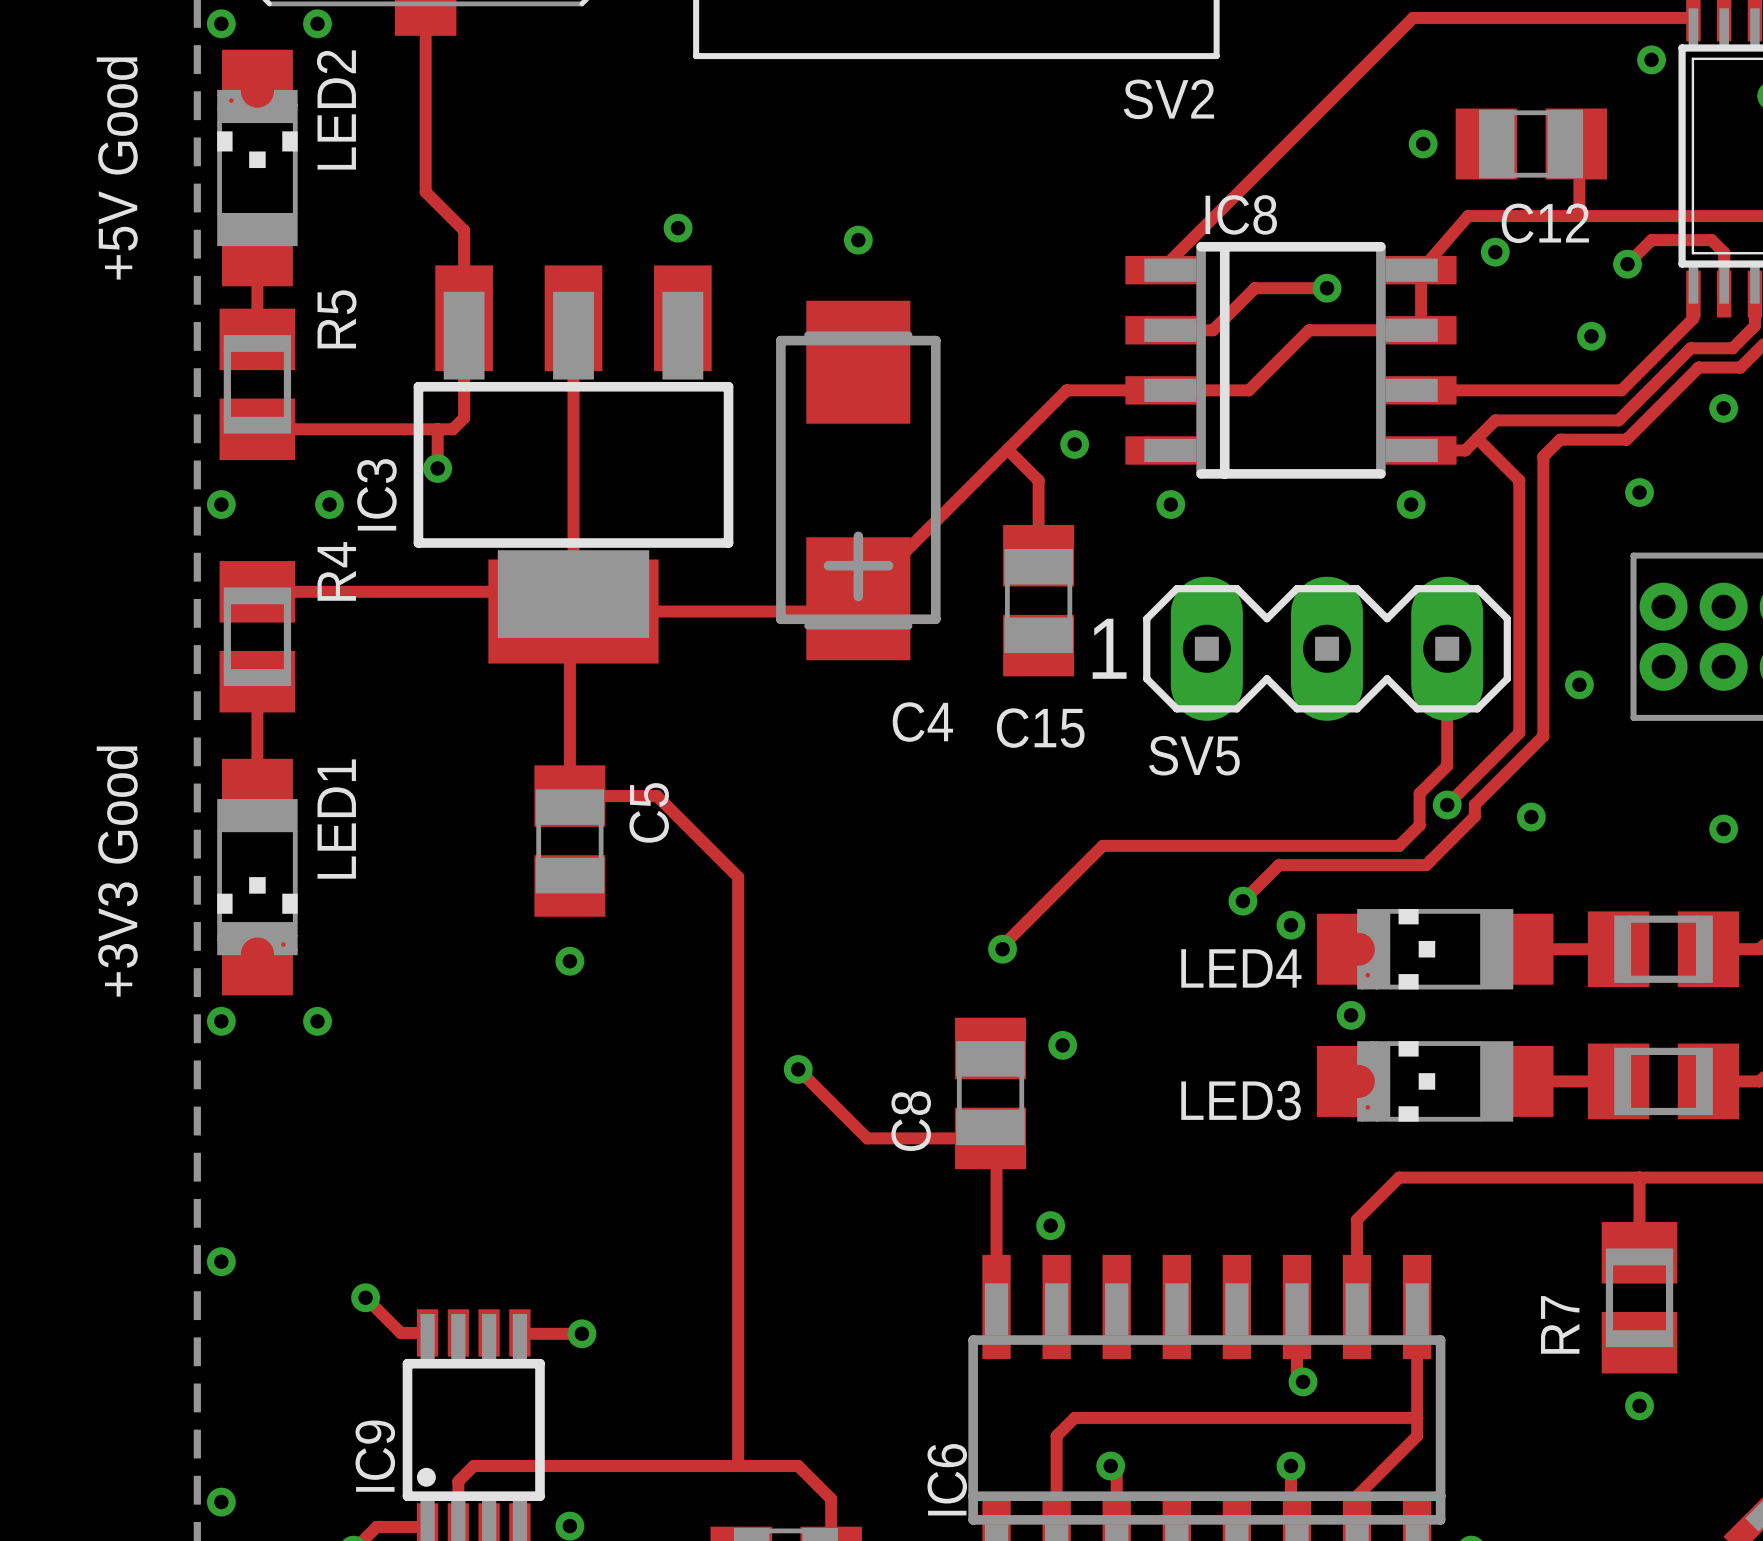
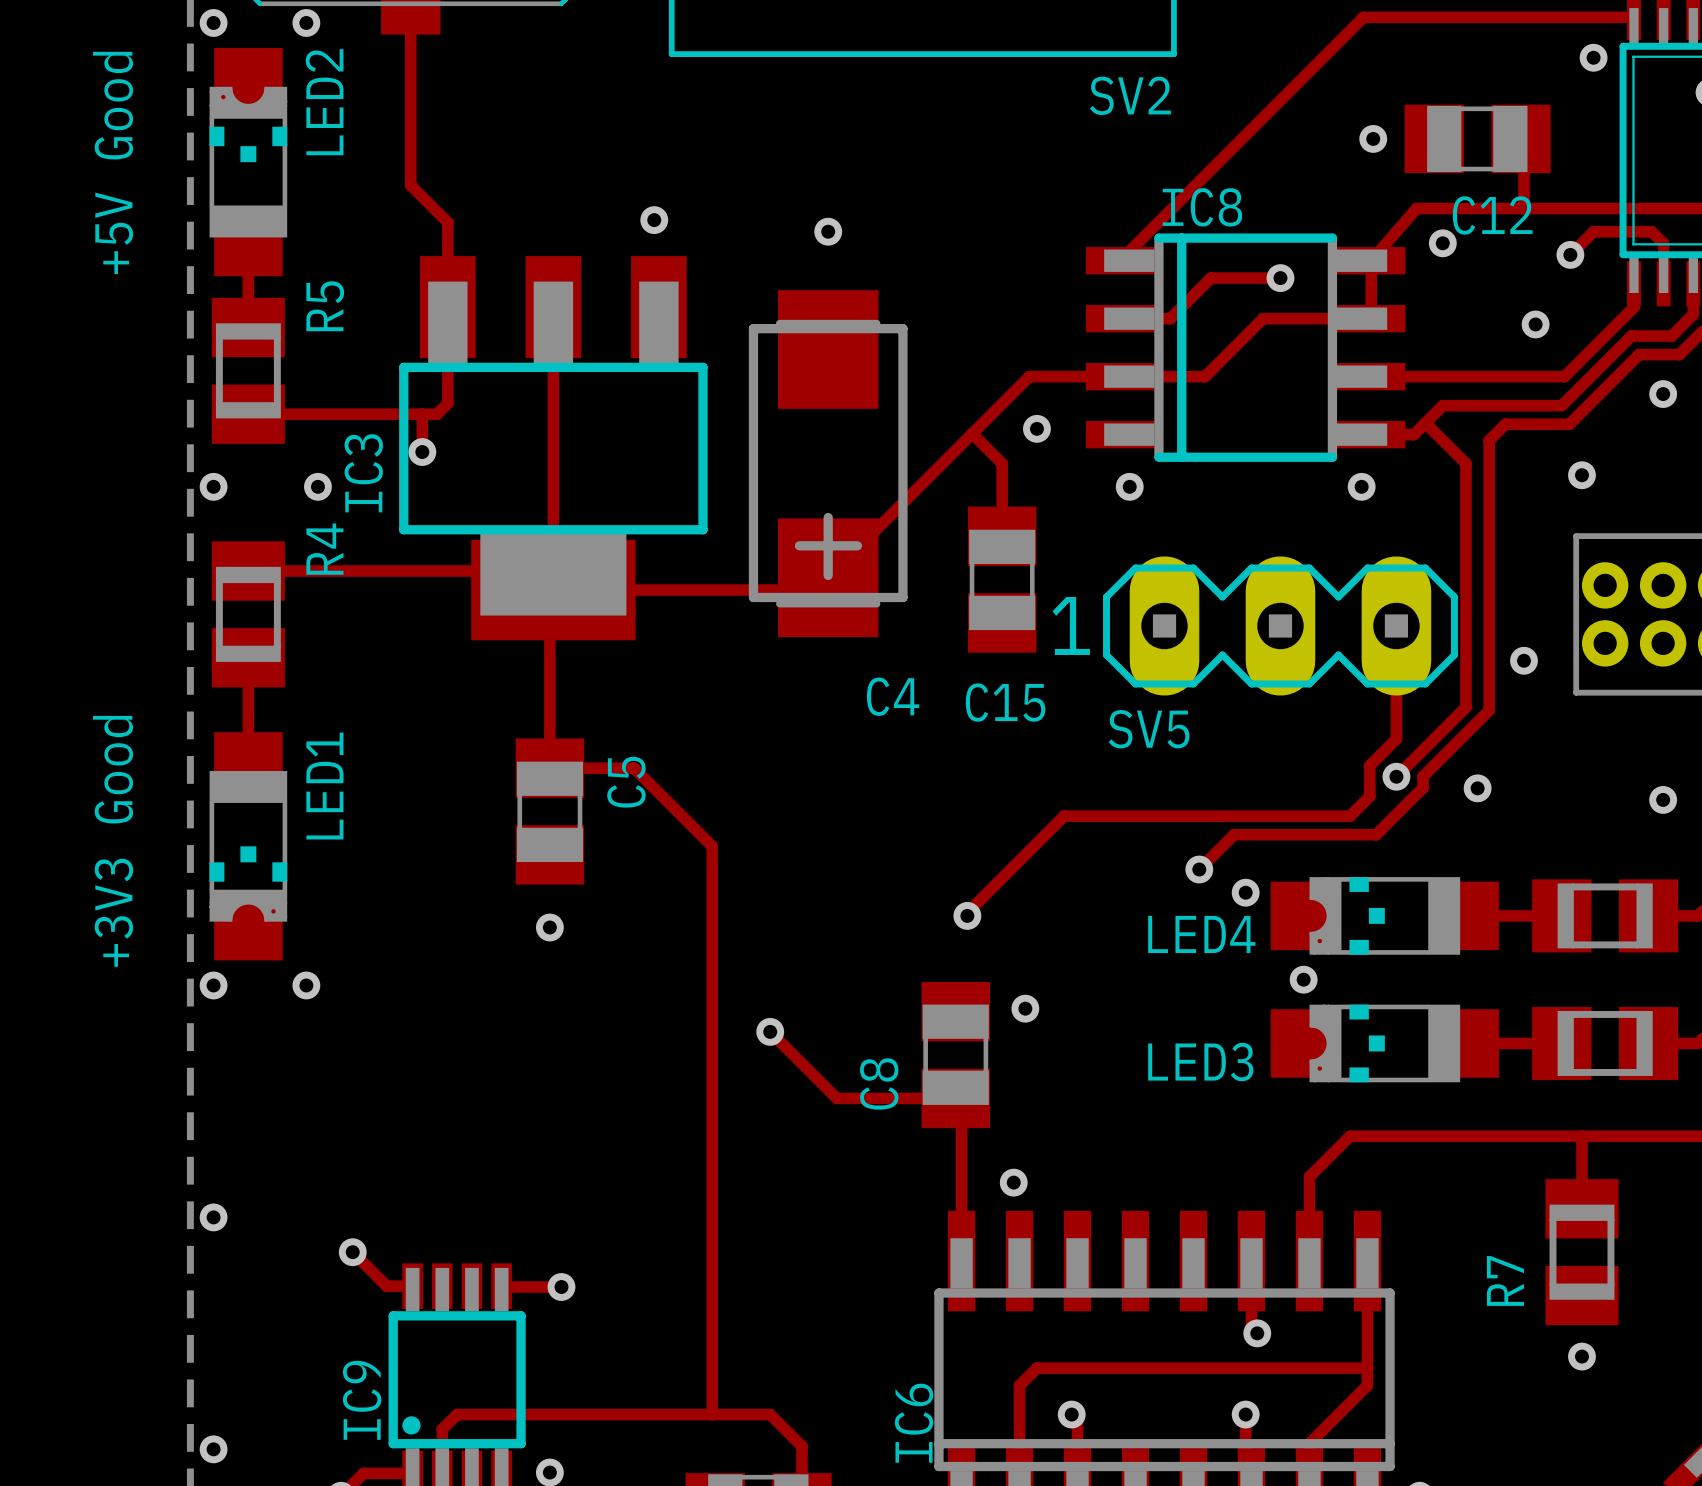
IC3 footprint: [413, 265, 734, 664] -> [399, 256, 708, 641]

